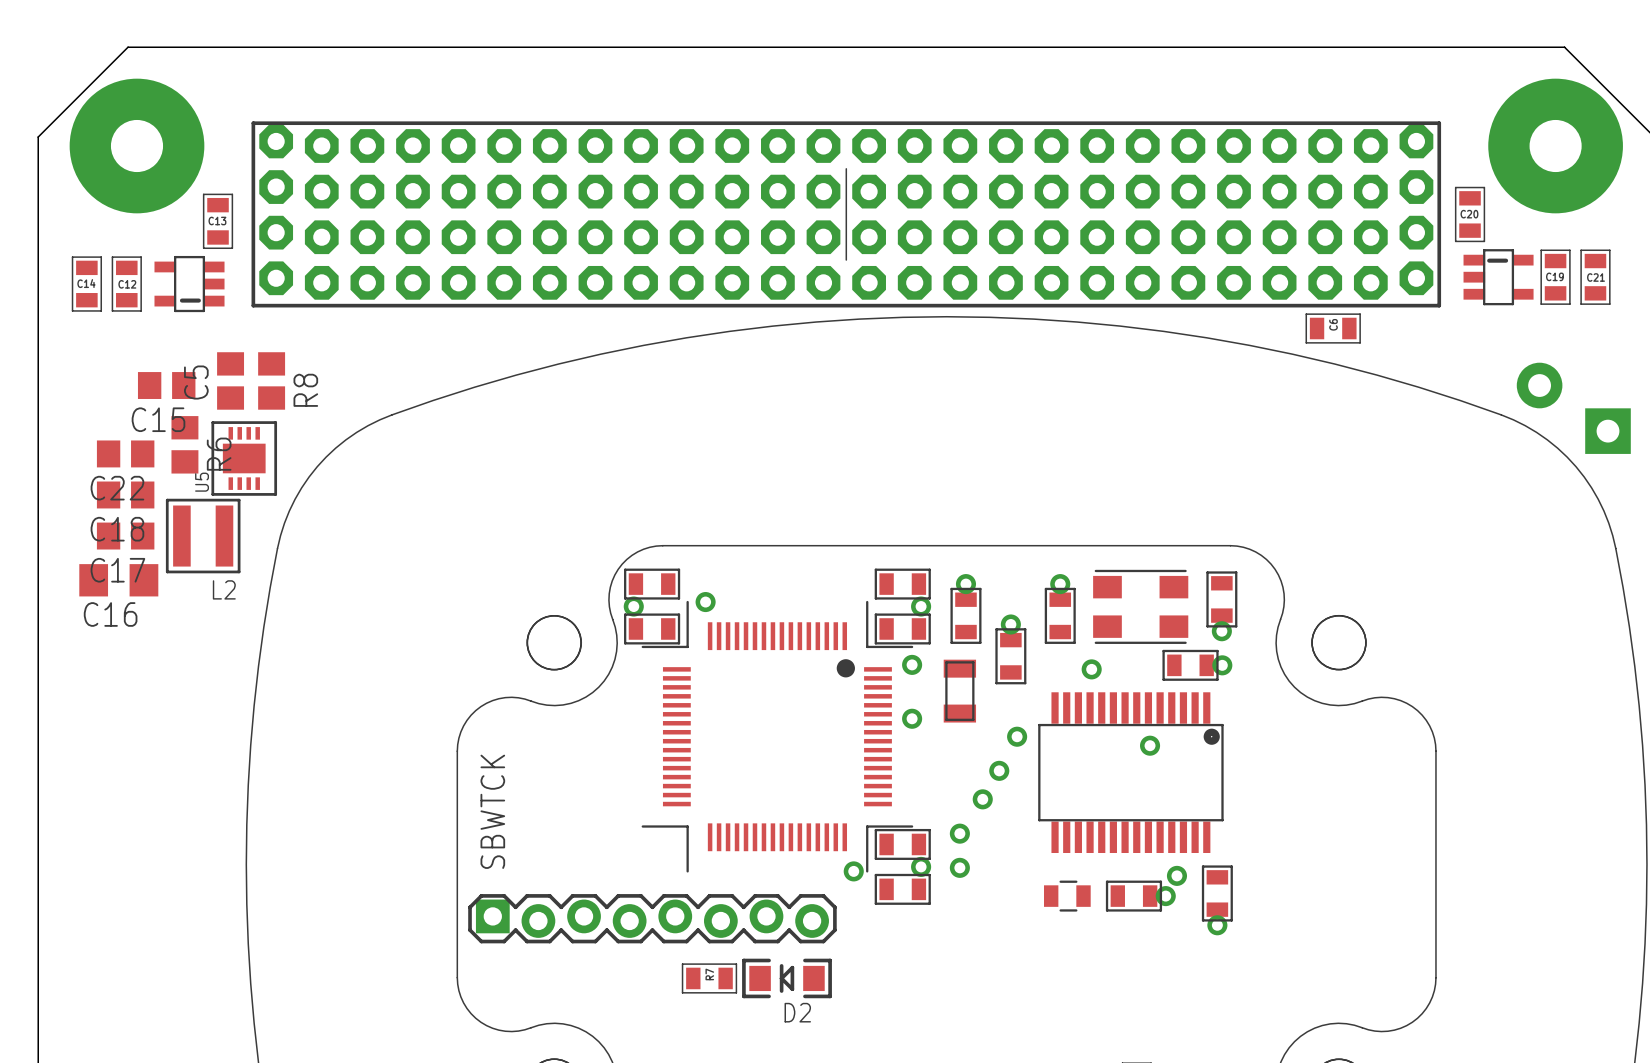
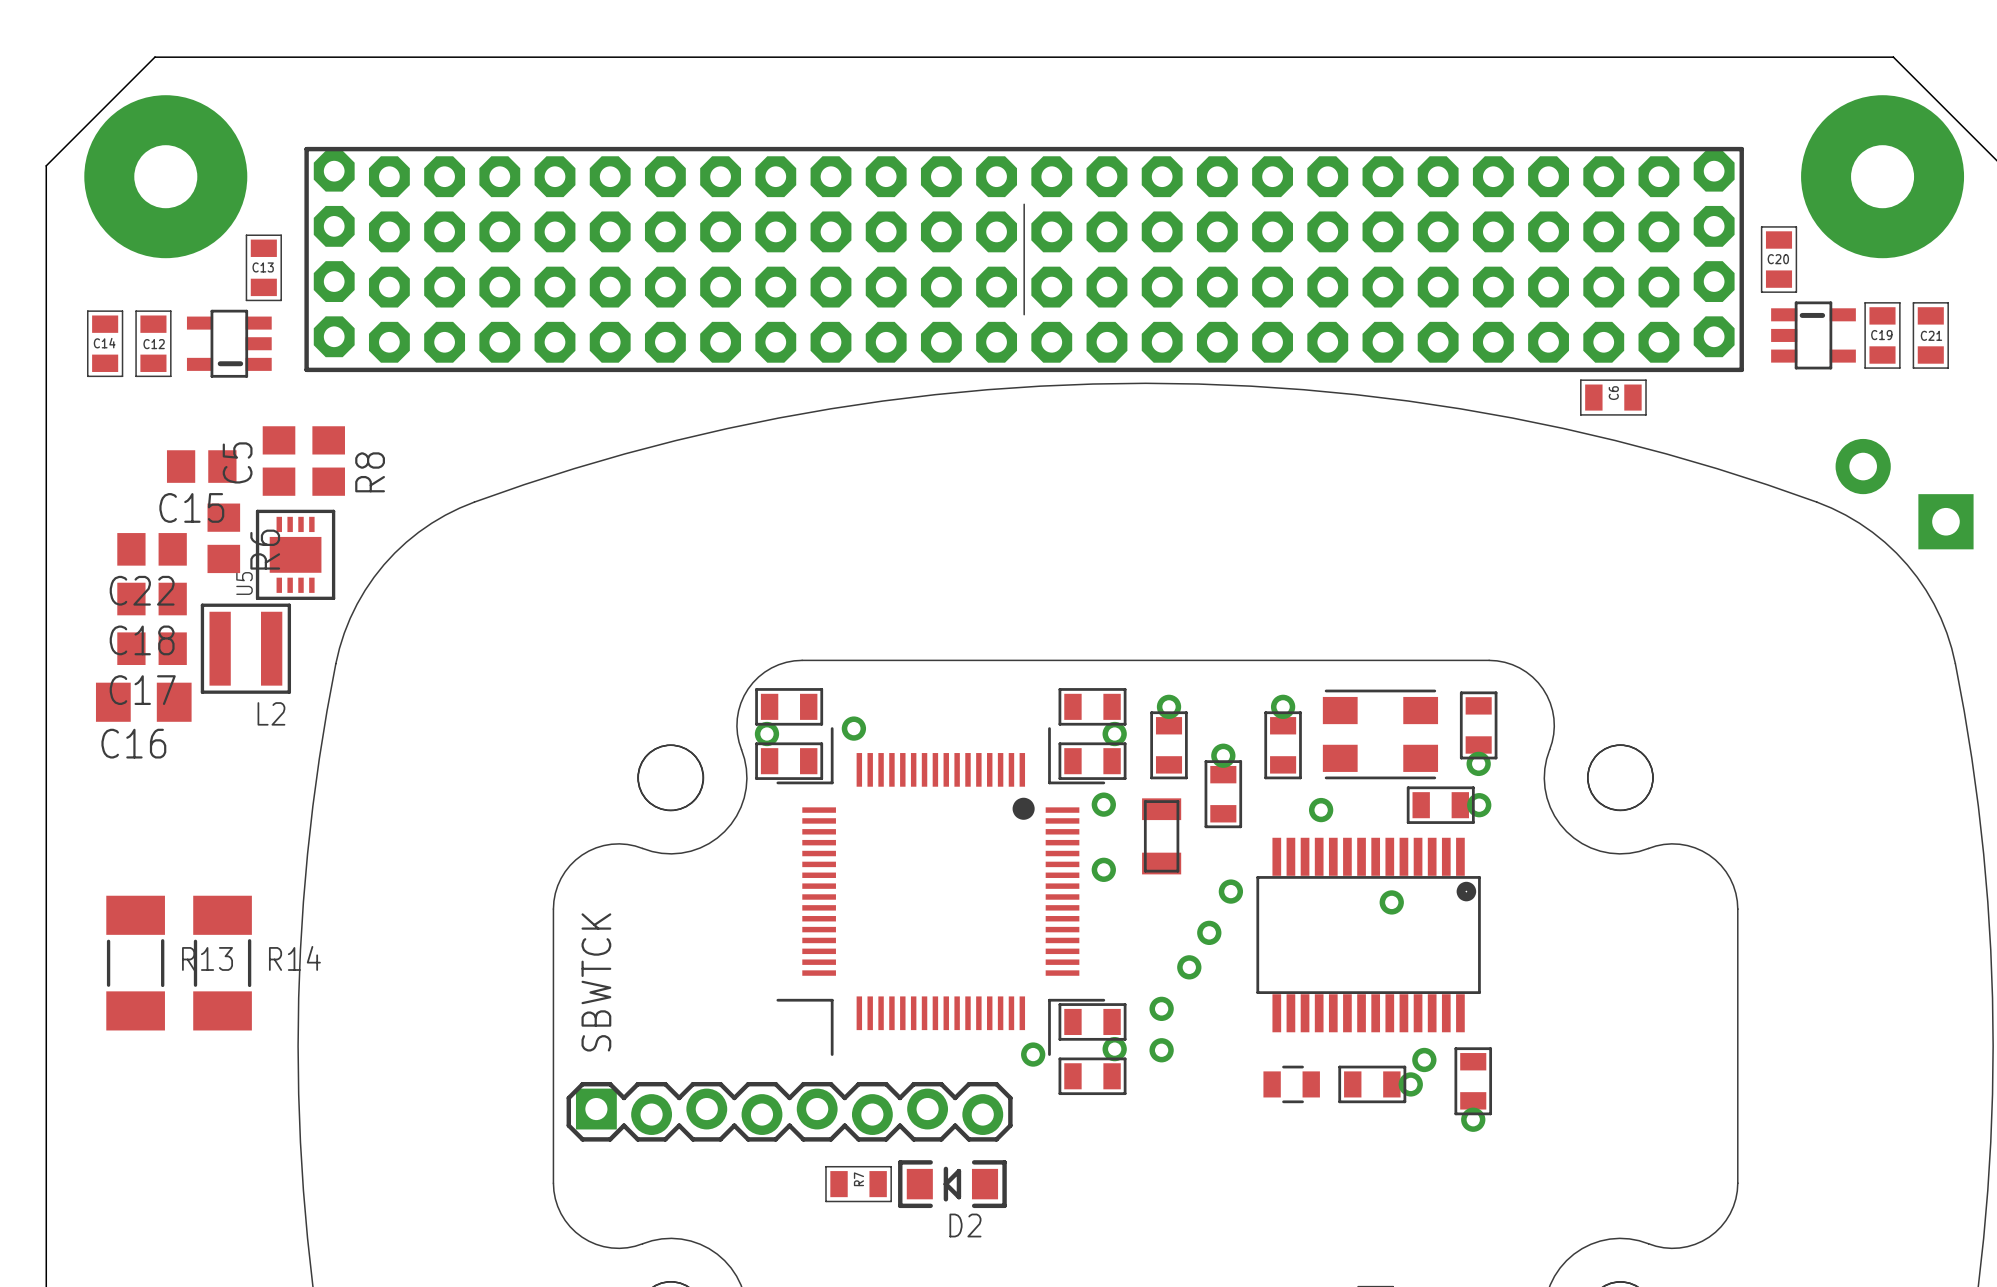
R13: none -> (135, 963)
R14: none -> (222, 963)

